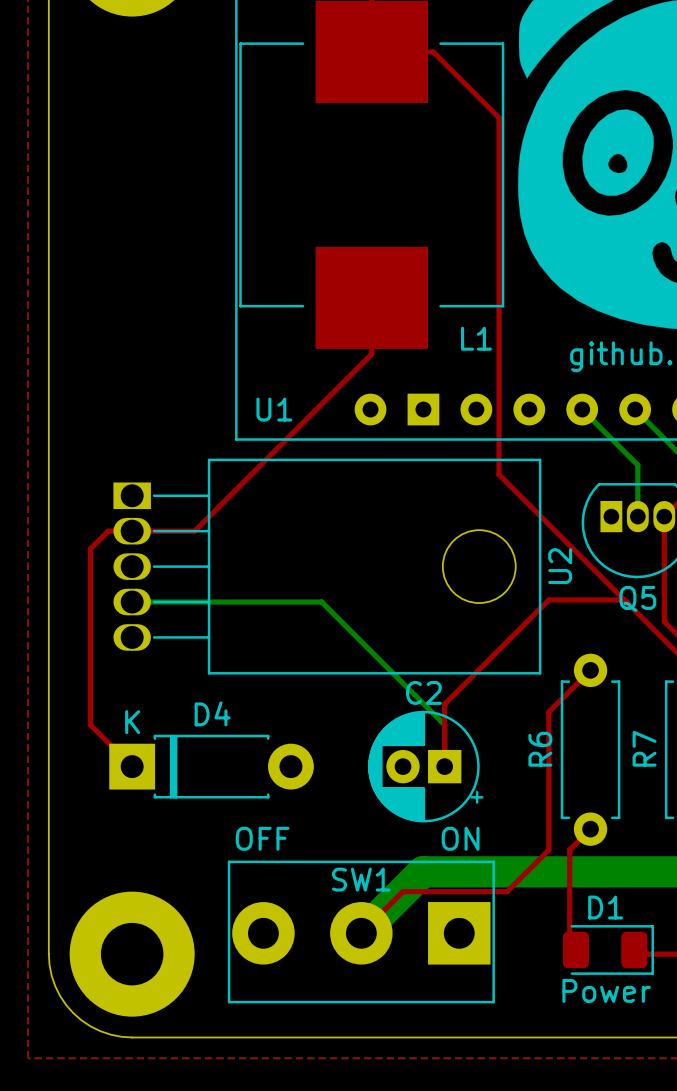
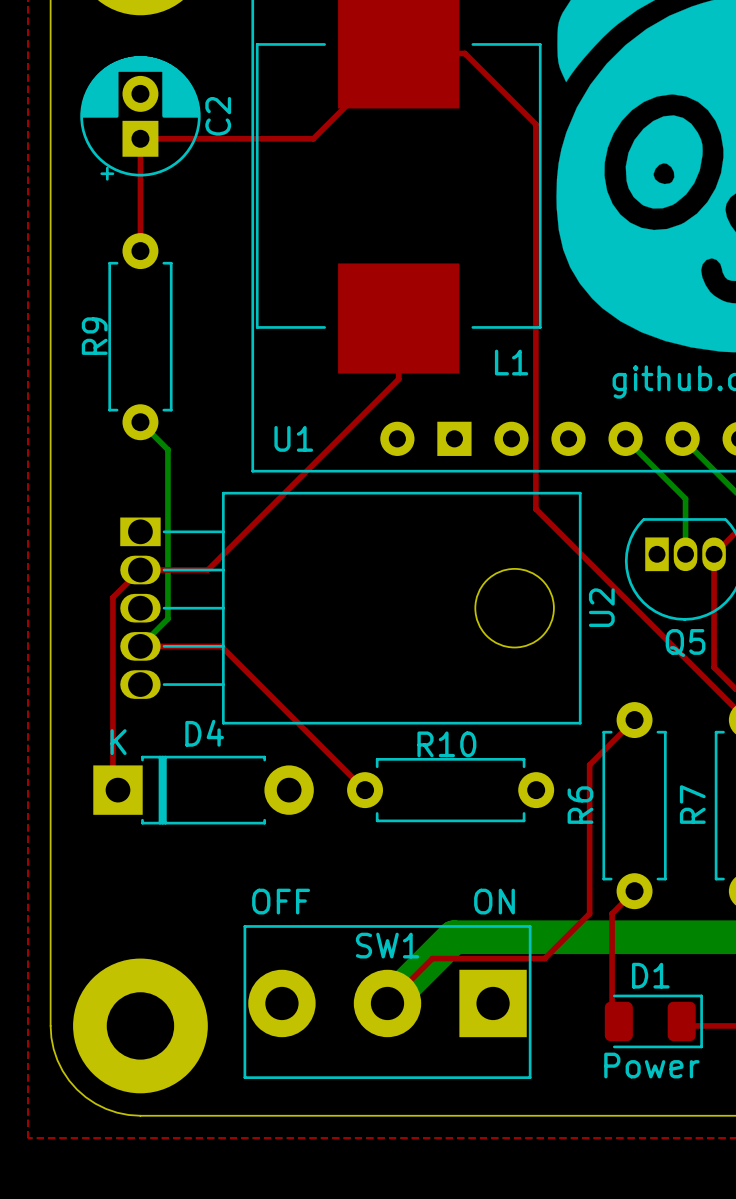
top track: none -> (347, 105) (313, 138) (140, 138) (140, 251)
R9: none -> (140, 336)
top track: (132, 531) (108, 531) (90, 548) (90, 724) (132, 766) -> (140, 570) (112, 597) (112, 785) (117, 790)
top track: (624, 599) (548, 599) (444, 704) (444, 766) -> none
top track: none -> (140, 646) (221, 646) (365, 790)
bottom track: (132, 602) (321, 602) (444, 724) (444, 766) -> (140, 646) (167, 618) (167, 449) (140, 422)
R10: none -> (450, 790)
D4 position: (211, 766) -> (203, 790)
C2 rotation: 0° (425, 766) -> 90° clockwise (140, 118)
C2 position: (425, 766) -> (140, 118)

